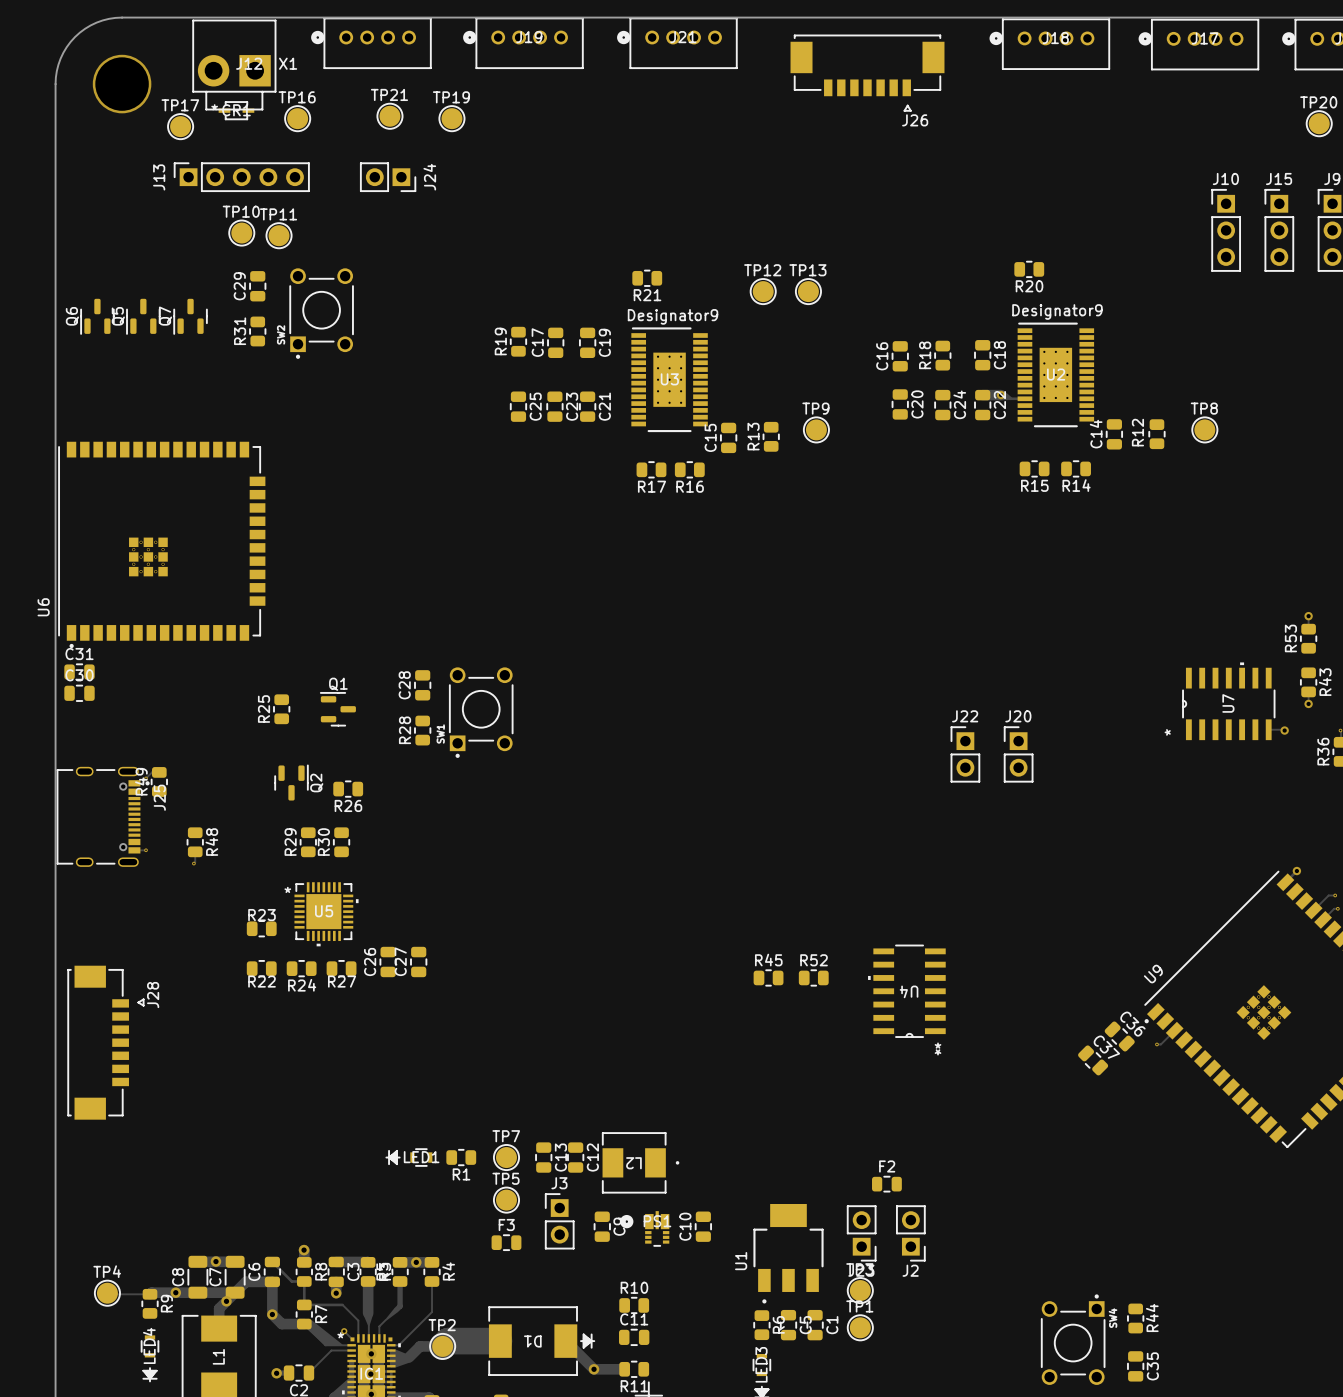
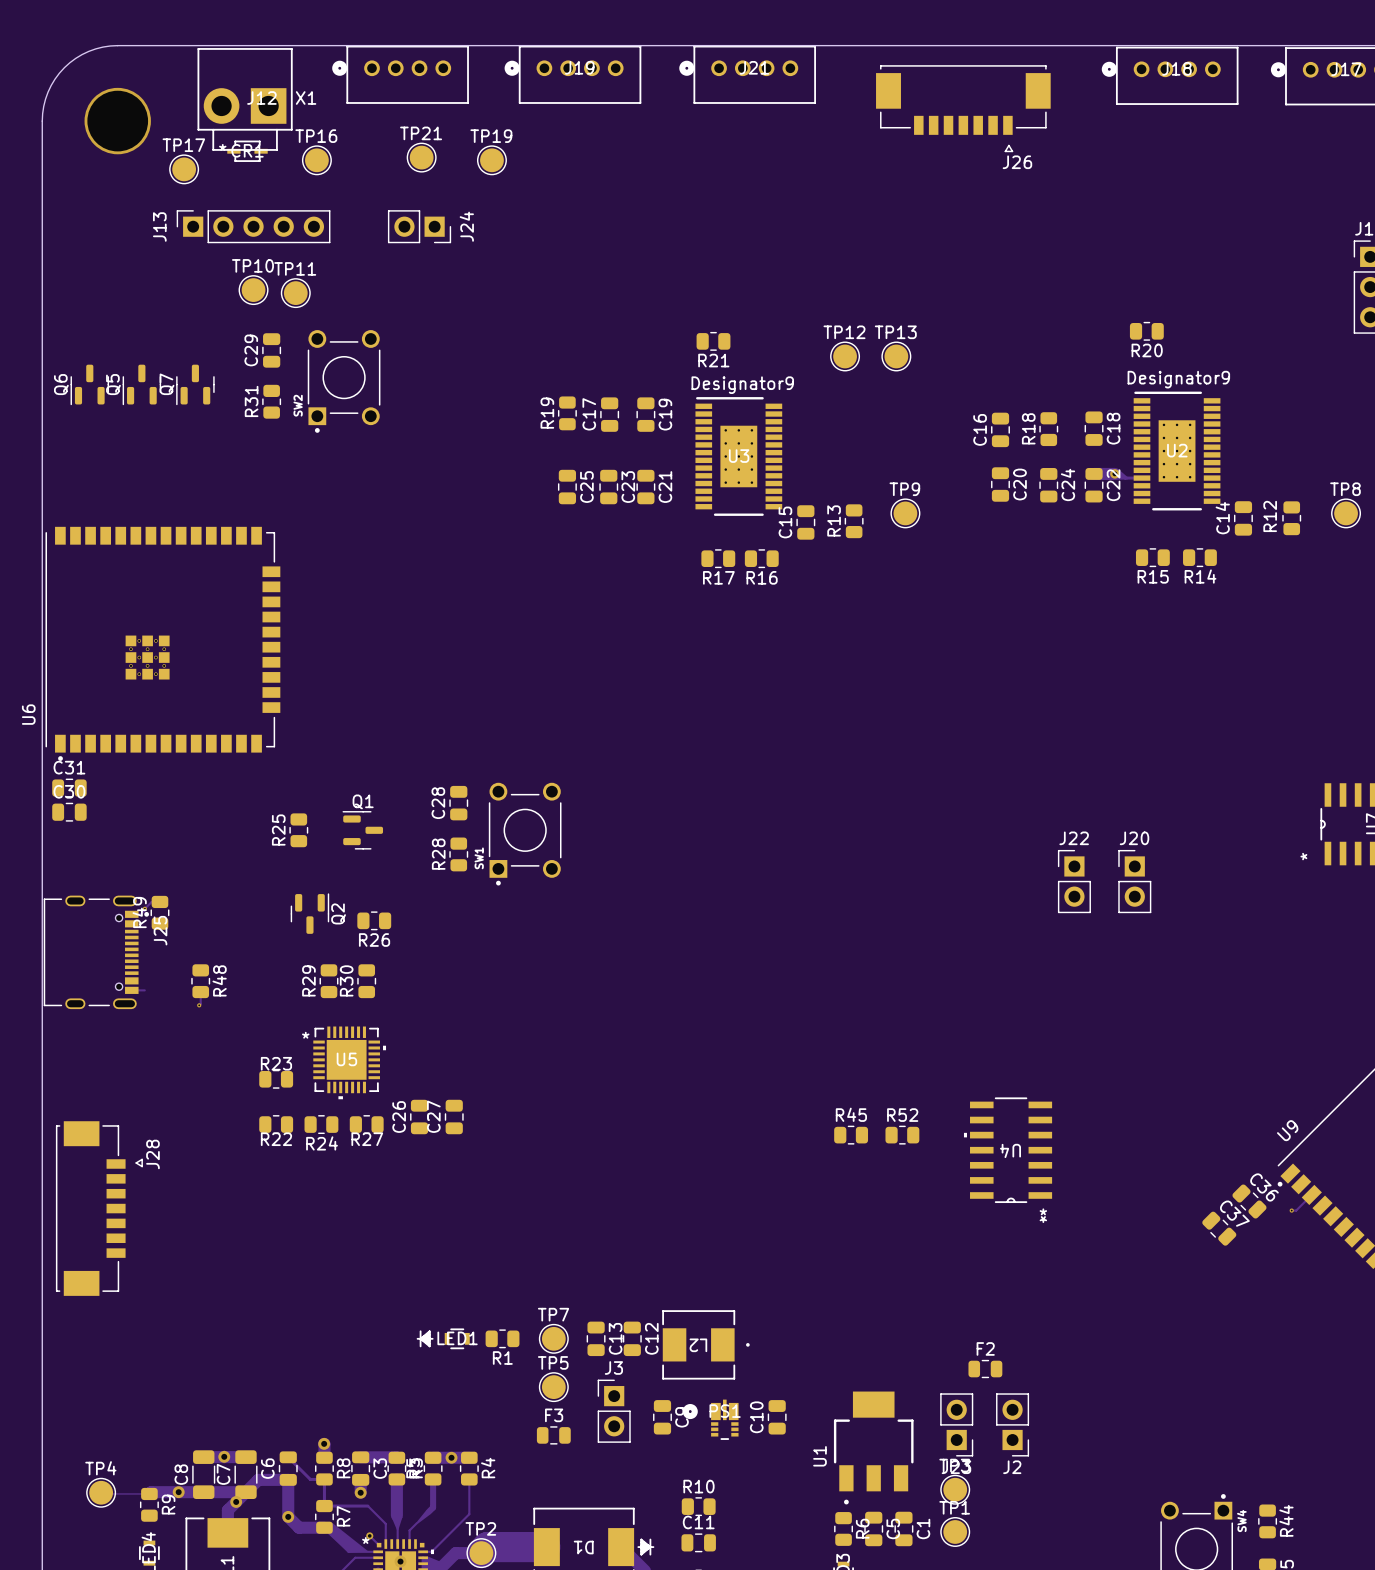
via: (146, 850) -> none

